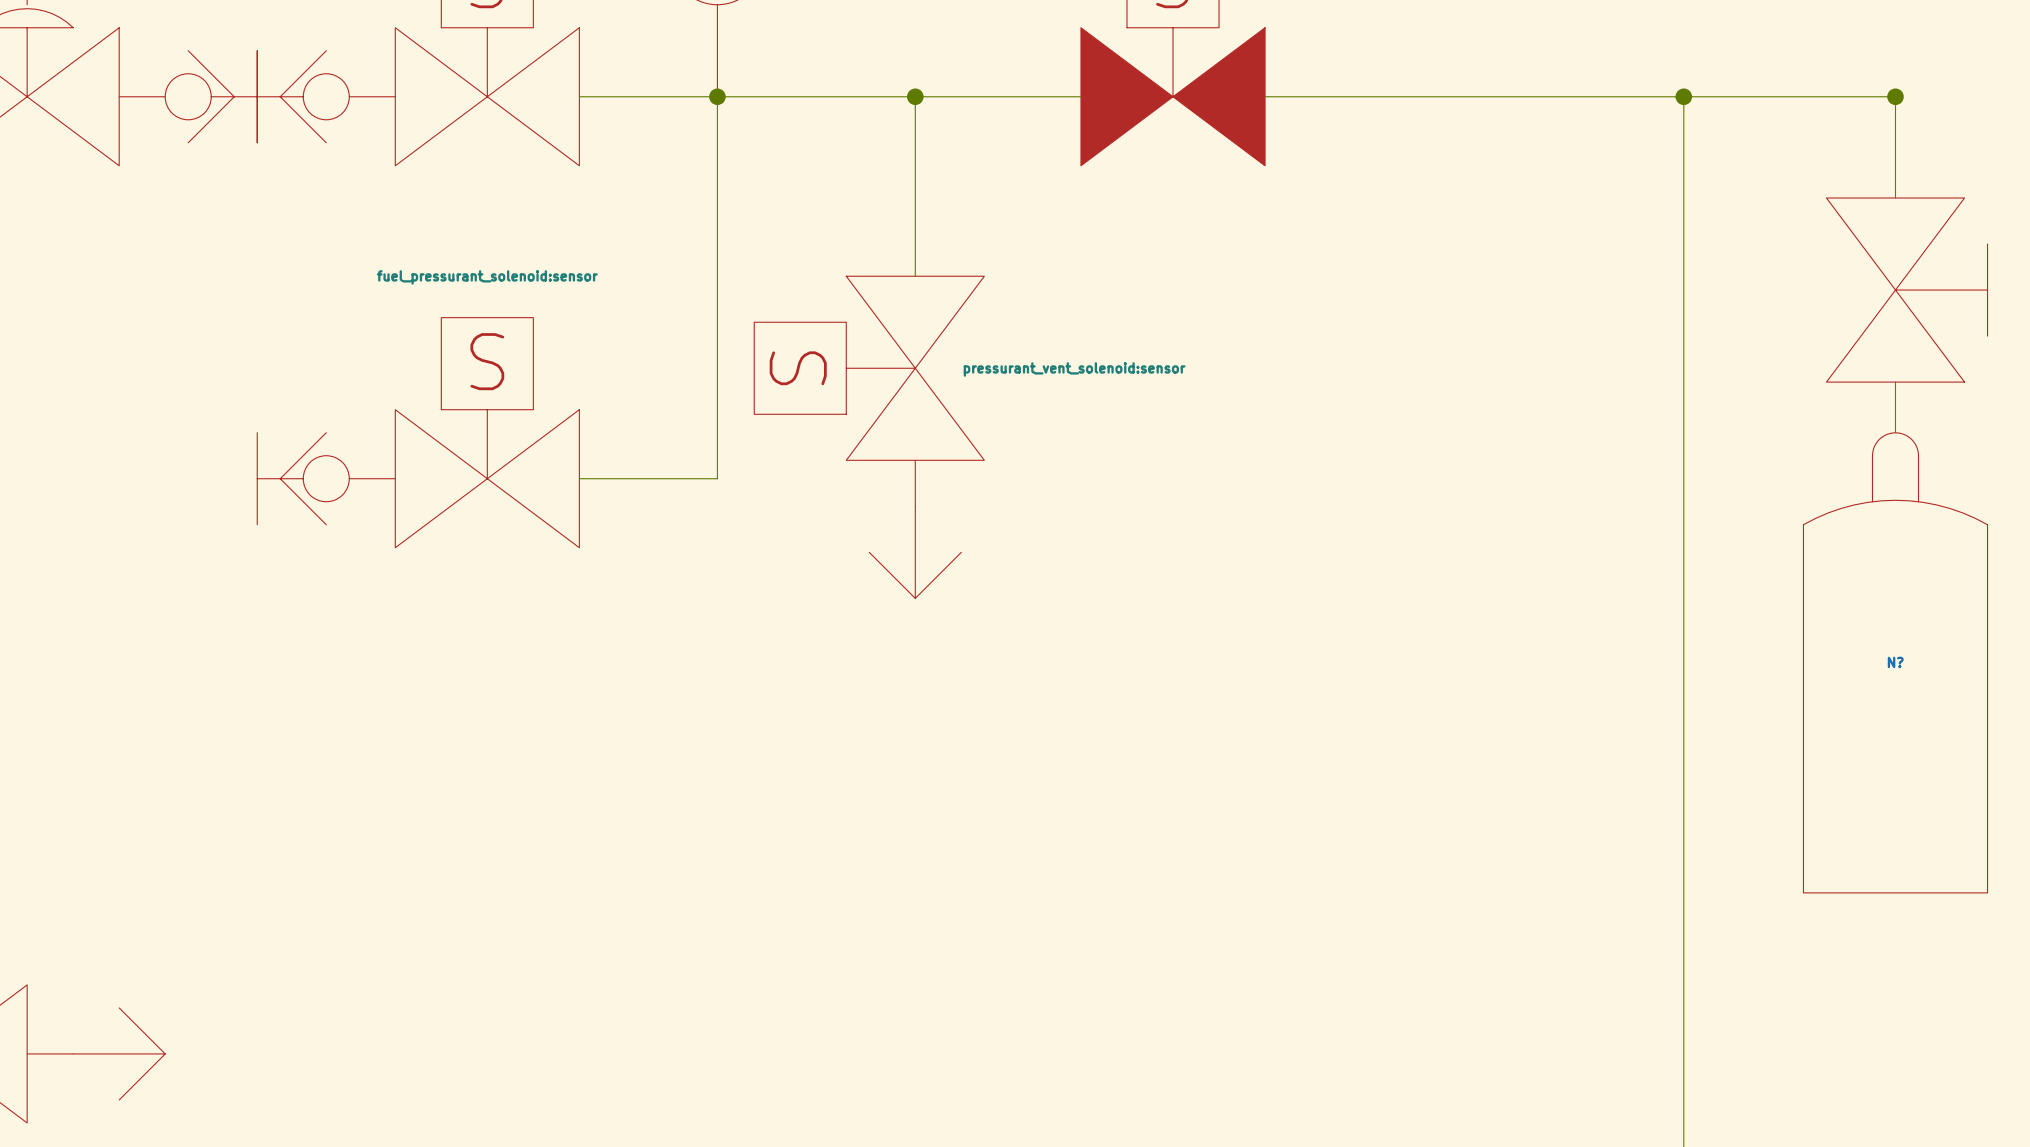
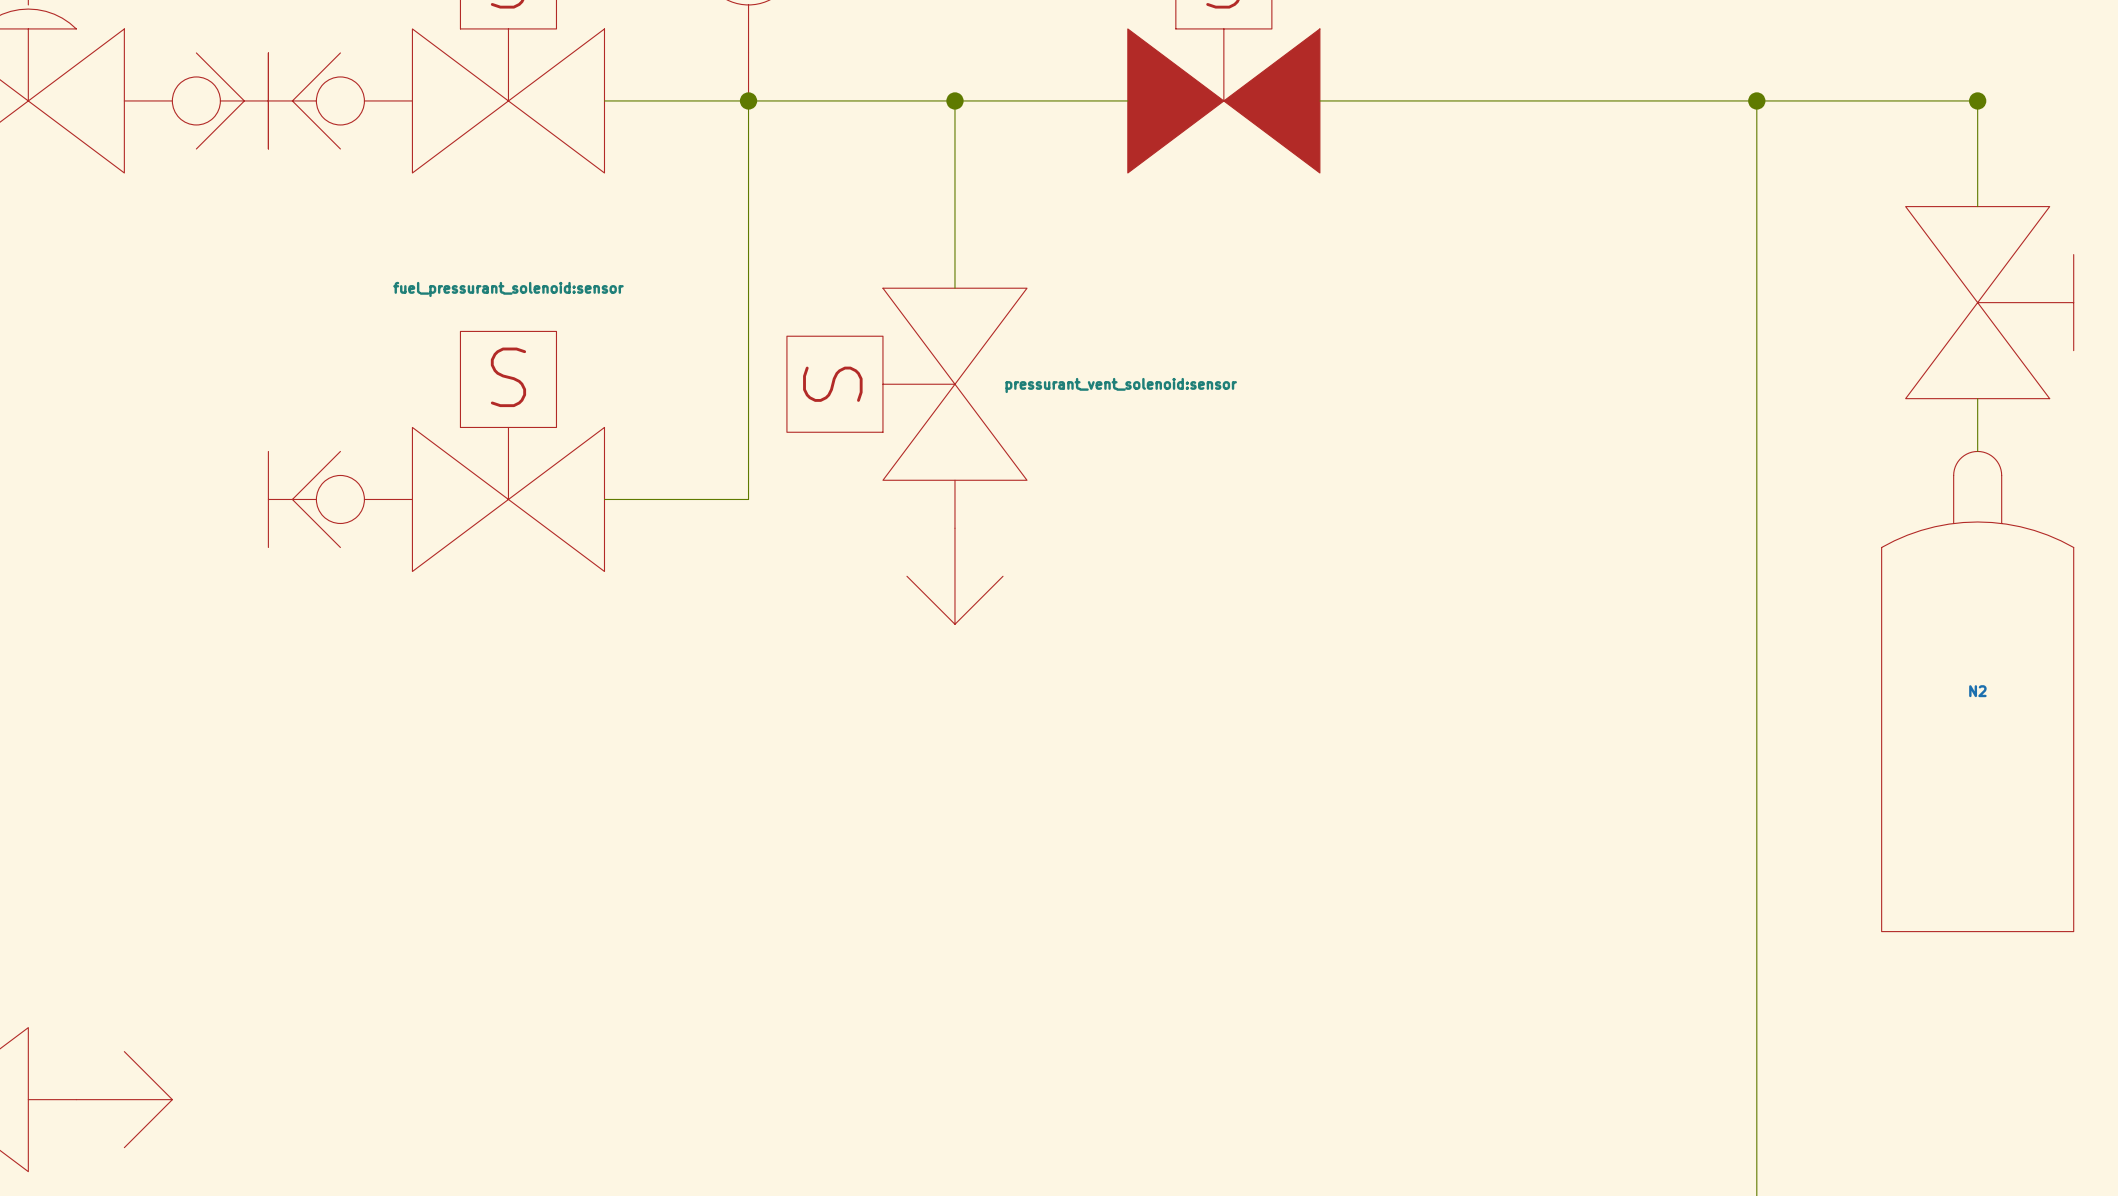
N?: (1895, 662) -> none
N2: none -> (1977, 691)

